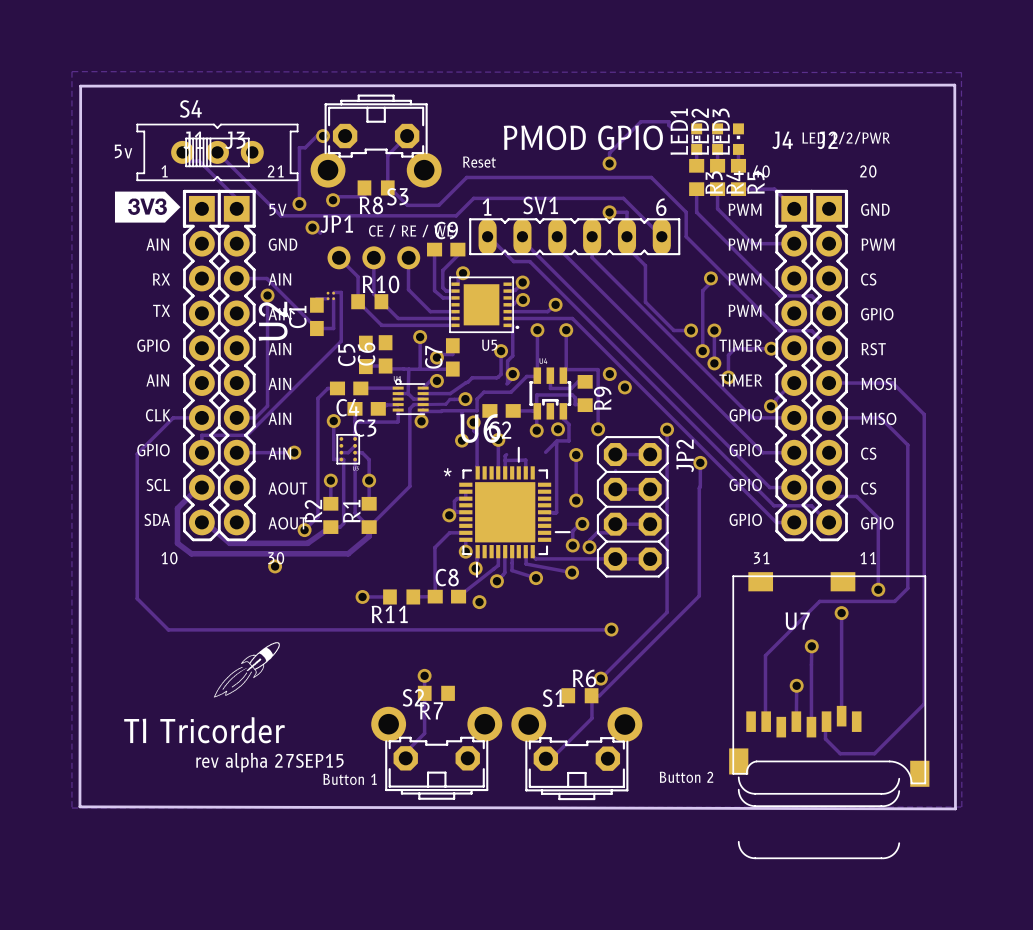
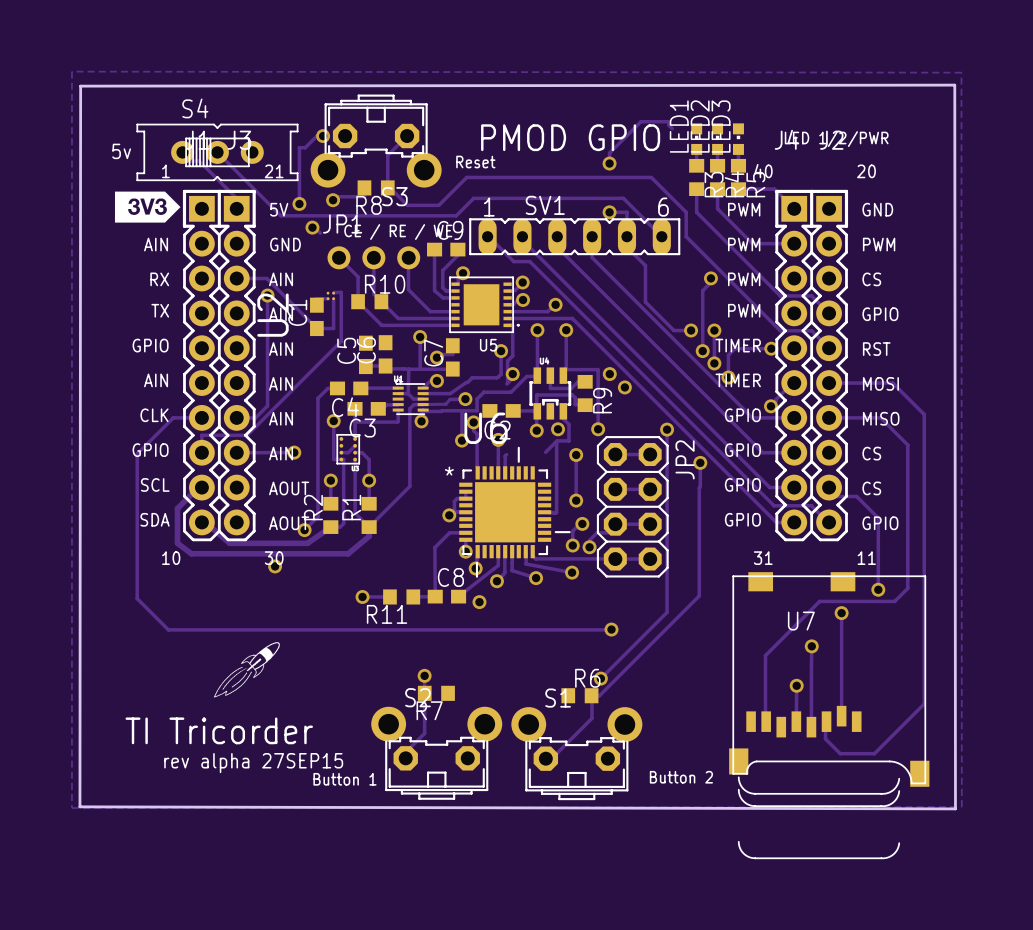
track: (505, 460) (525, 460) (525, 472) -> none

